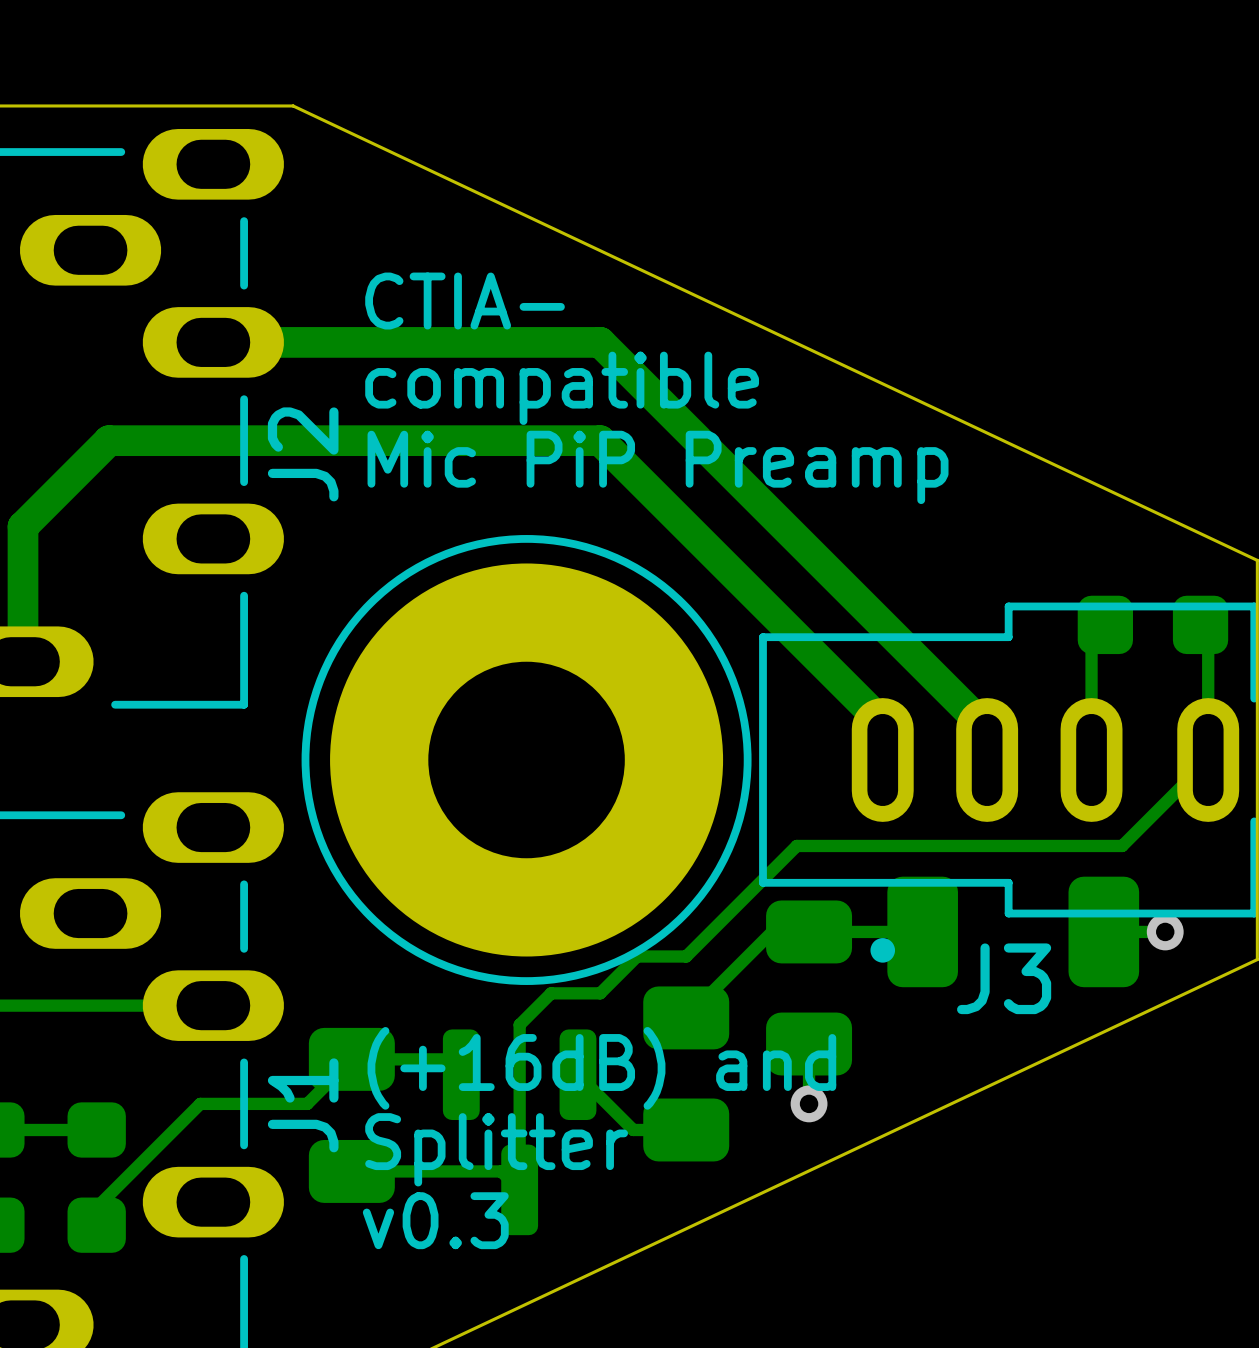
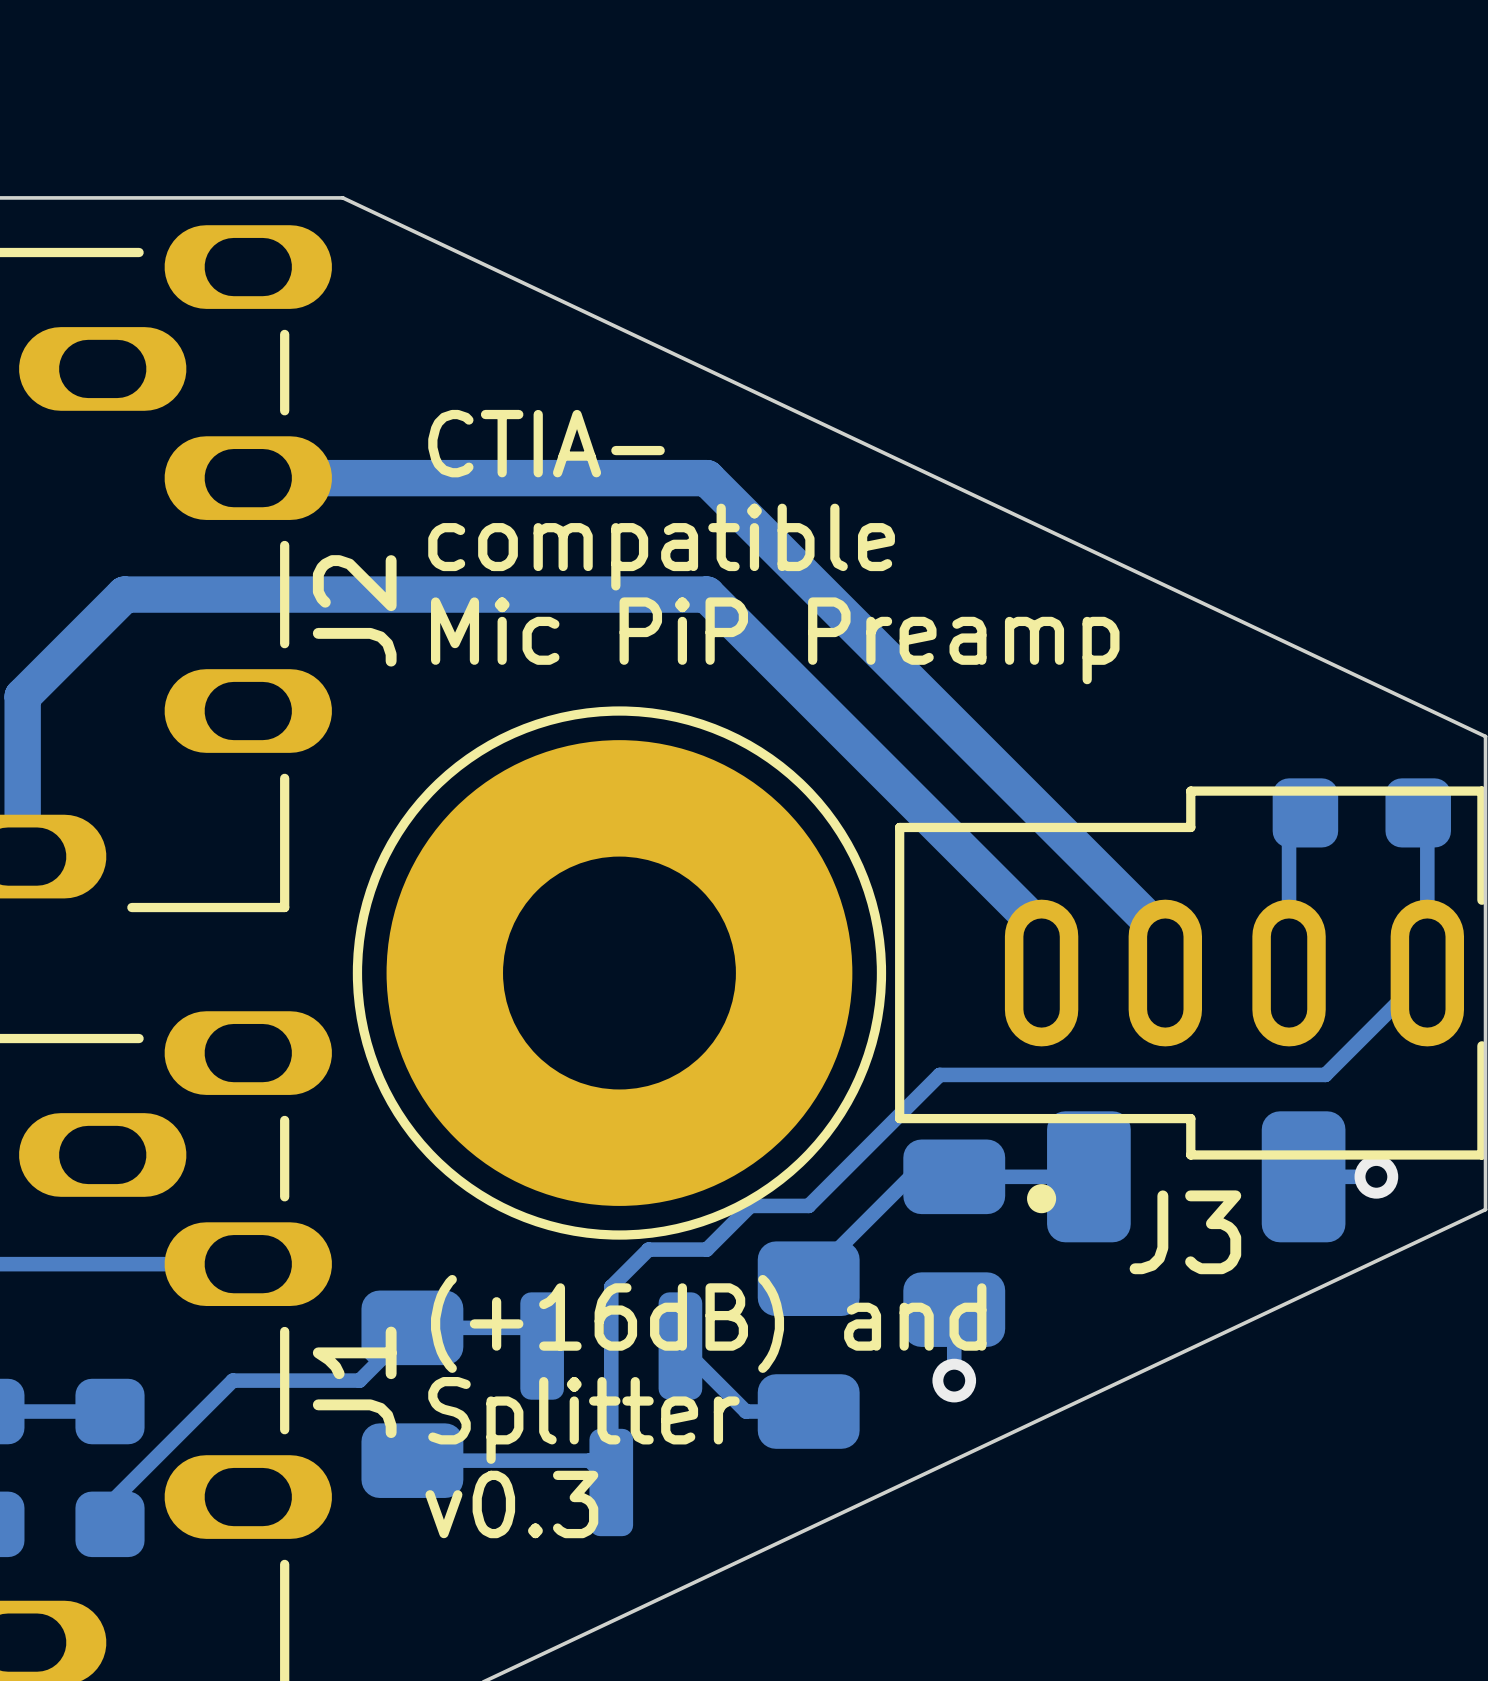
text position: CTIA- (465, 301) -> CTIA- (546, 443)
text position: compatible (562, 388) -> compatible (661, 547)
text position: Mic PiP Preamp (658, 467) -> Mic PiP Preamp (775, 640)
text position: (+16dB) and (601, 1068) -> (+16dB) and (708, 1323)
text position: Splitter (496, 1149) -> Splitter (583, 1420)
text position: v0.3 (435, 1220) -> v0.3 (511, 1504)

